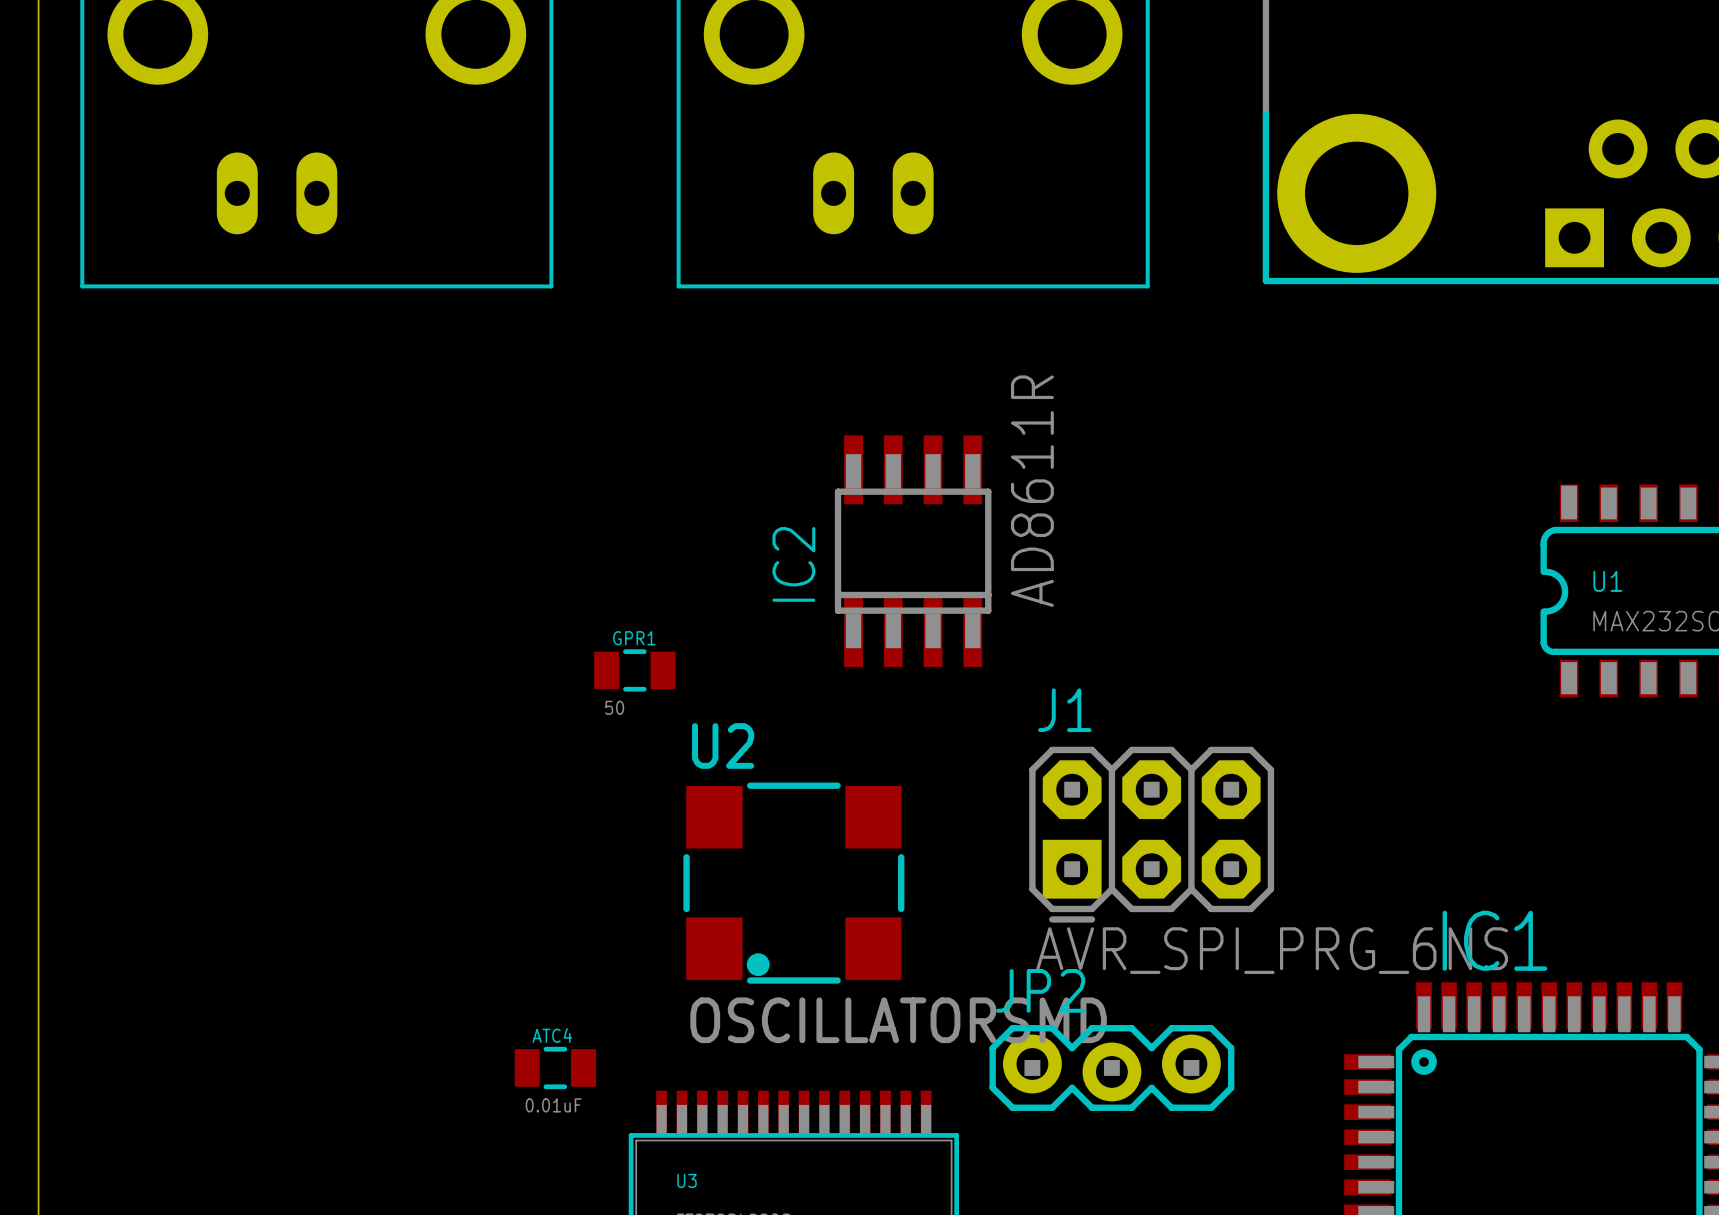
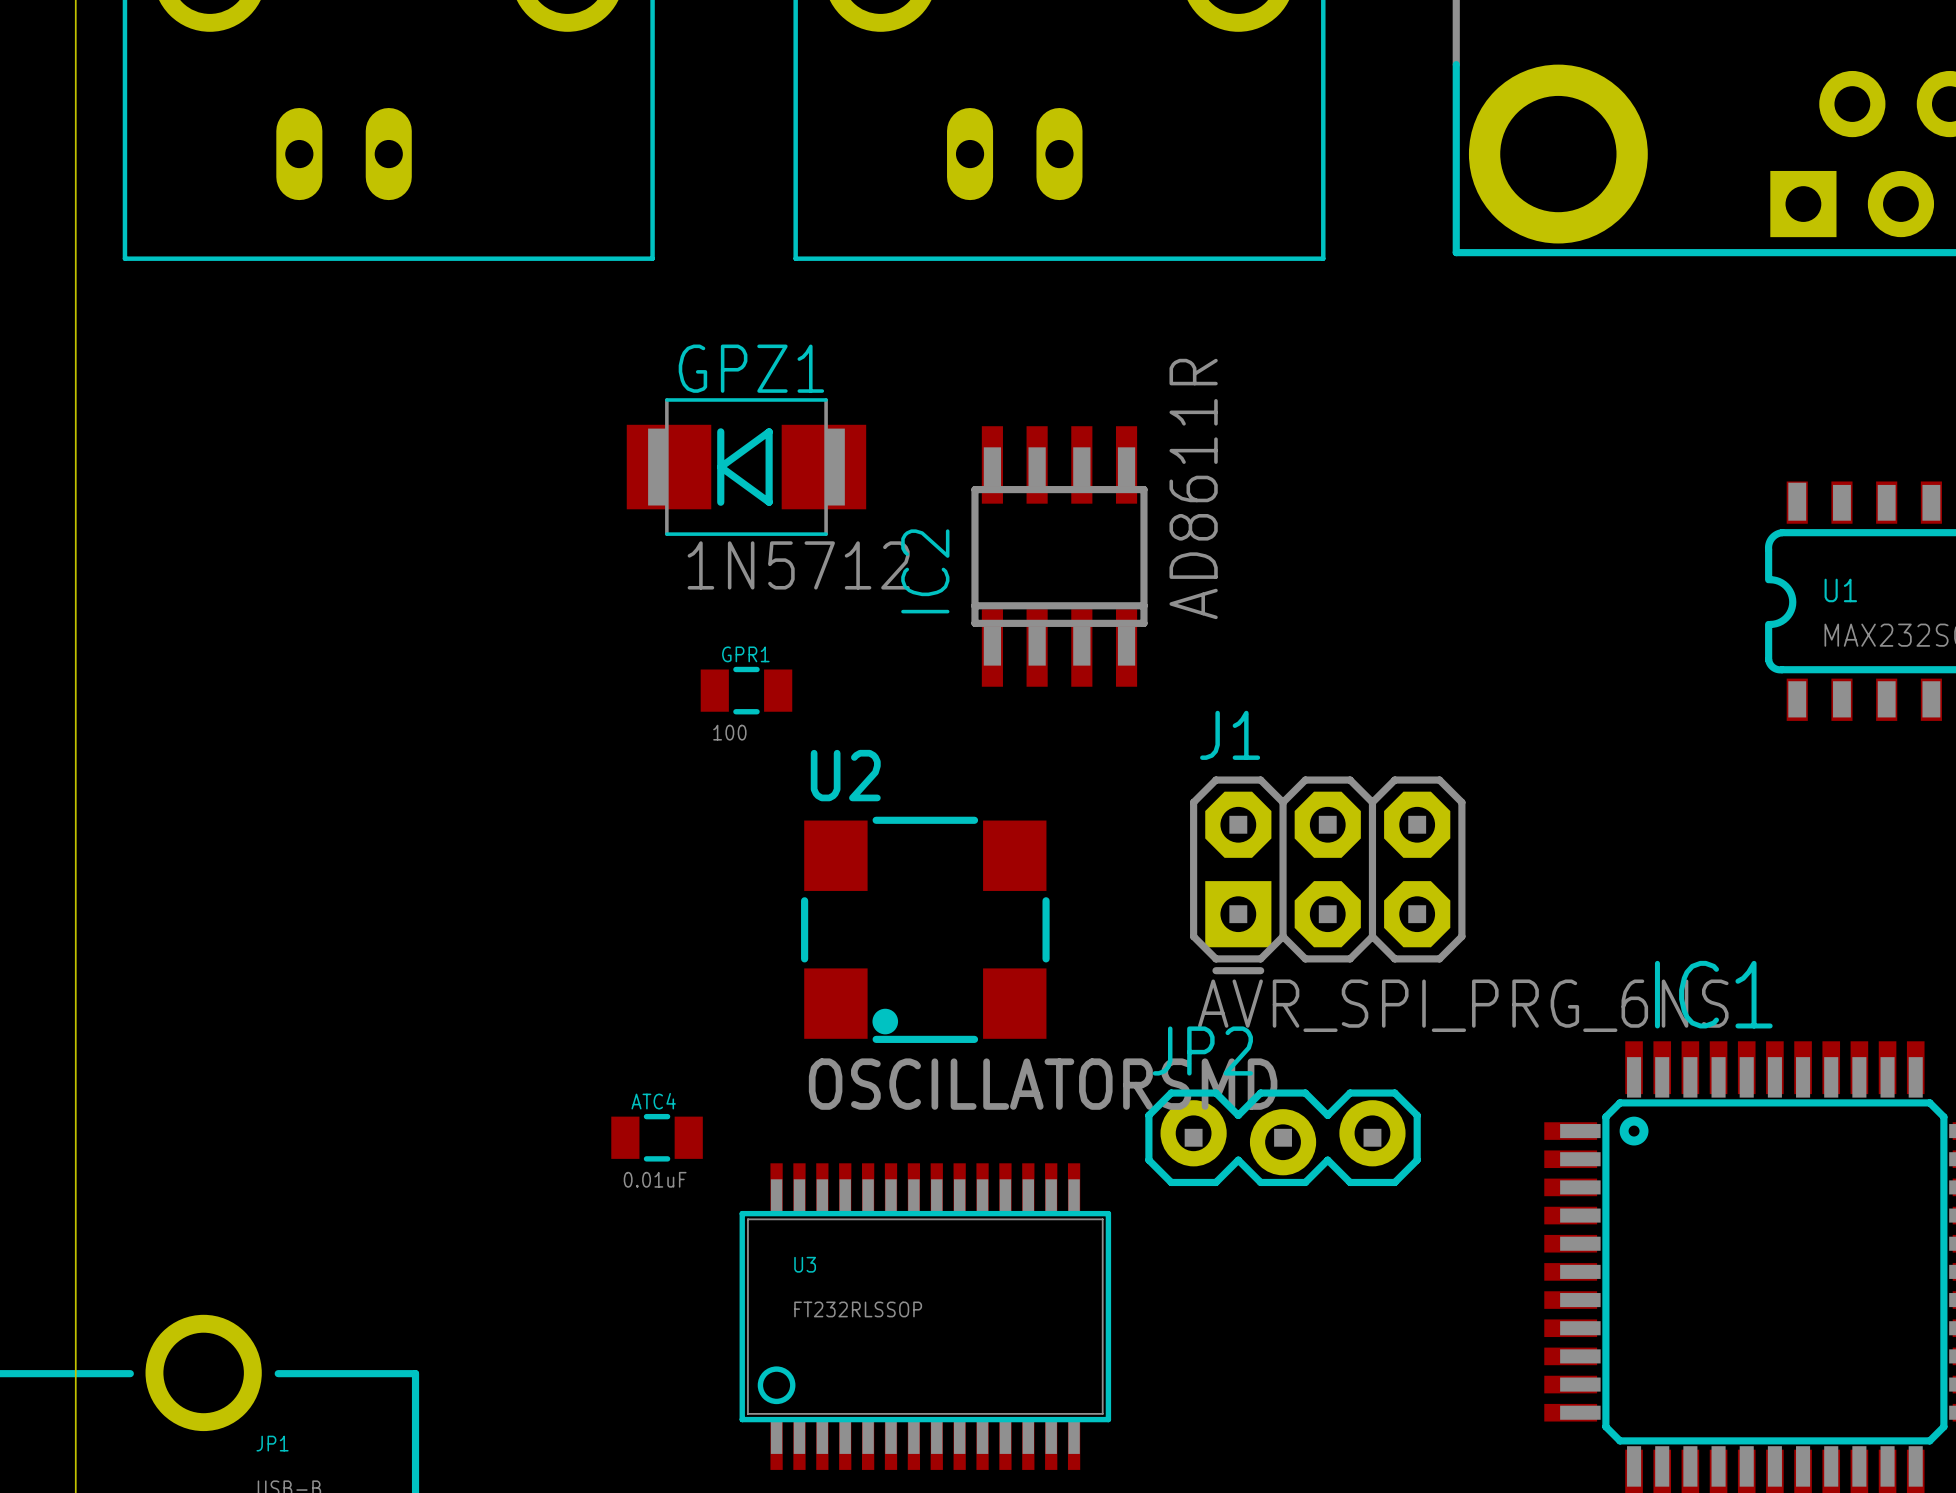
GPZ1: none -> 1N5712 (746, 467)
GPR1 value: 50 (614, 707) -> 100 (729, 732)

